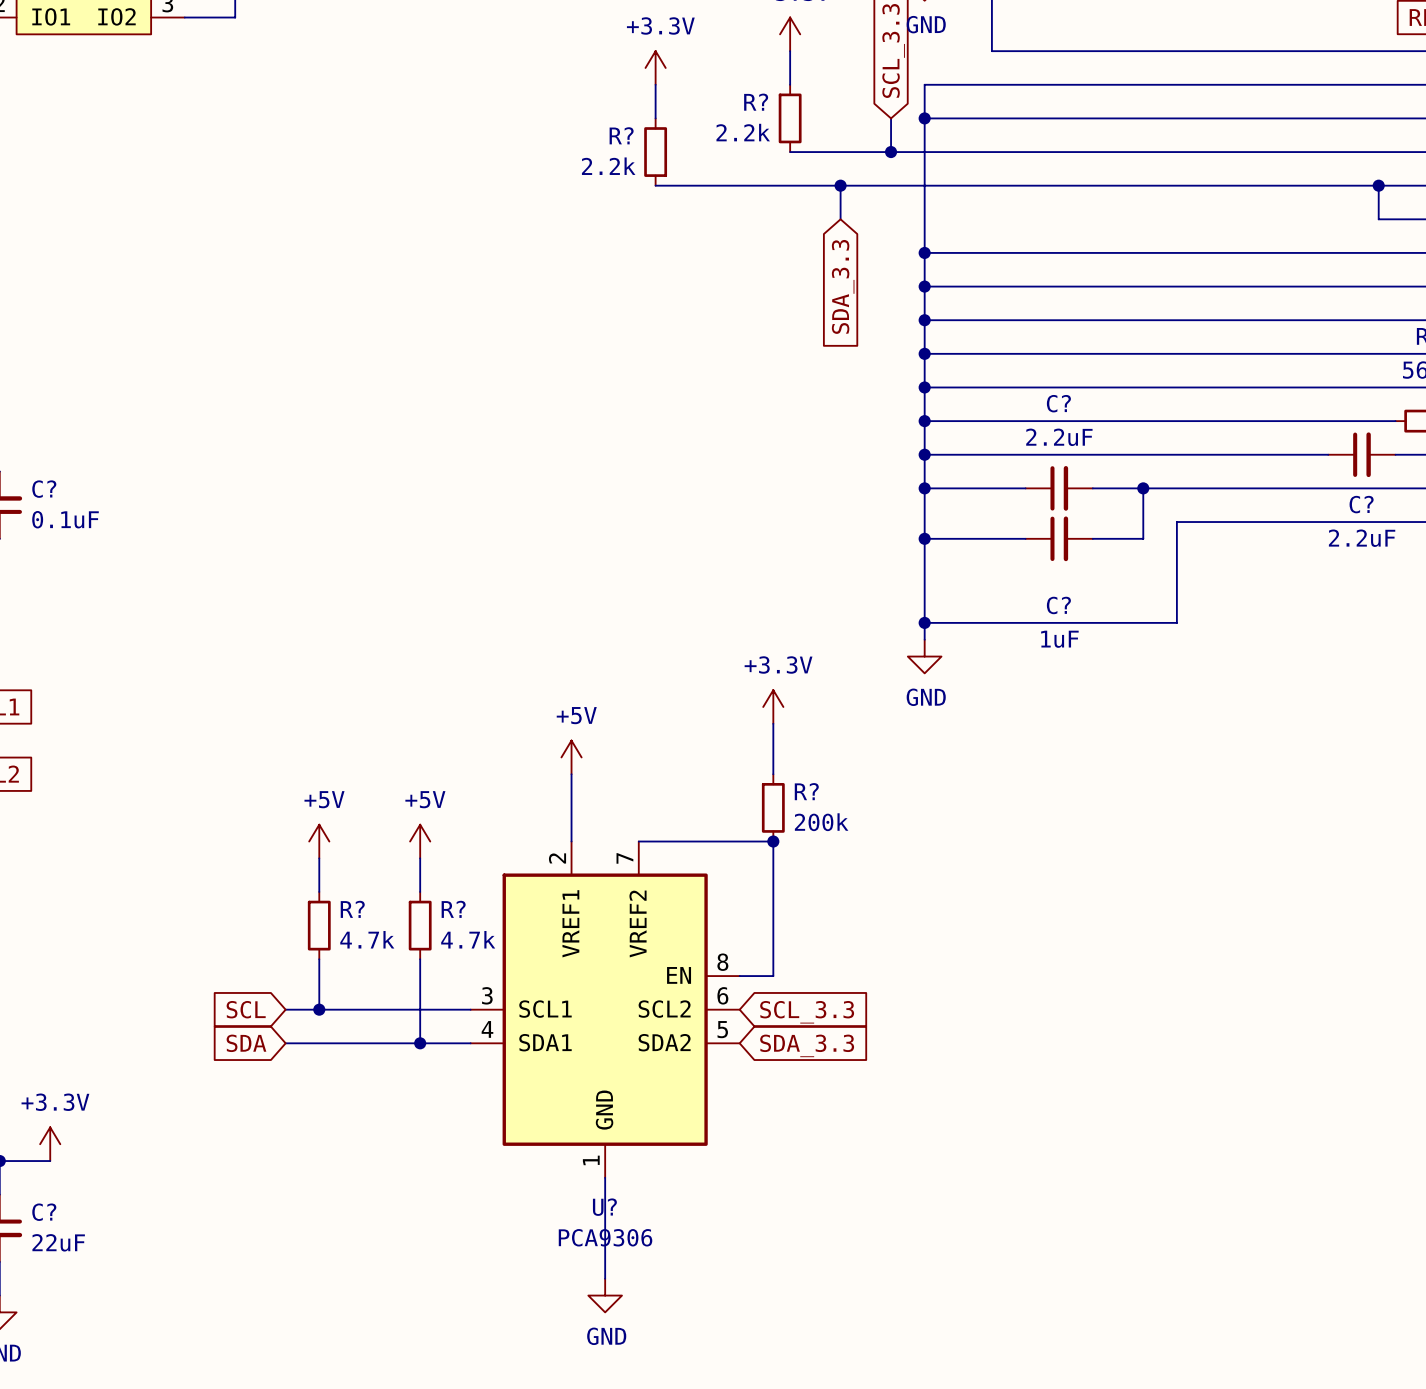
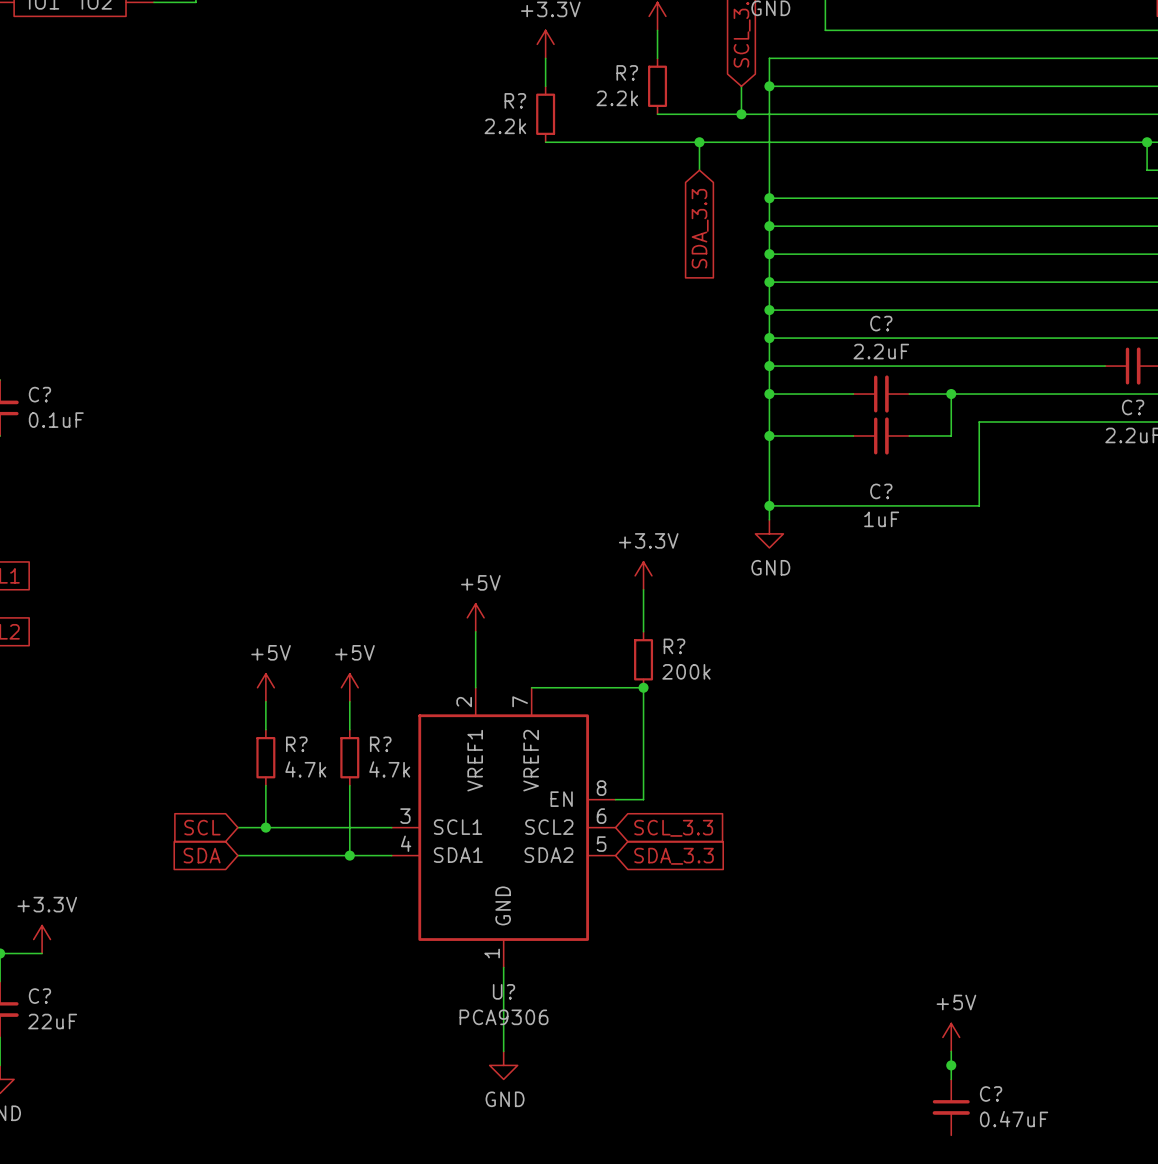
power symbol: none -> +5V (951, 1037)
wire: none -> (951, 1051) (951, 1079)
junction: none -> (951, 1065)
C?: none -> 0.47uF (951, 1107)

